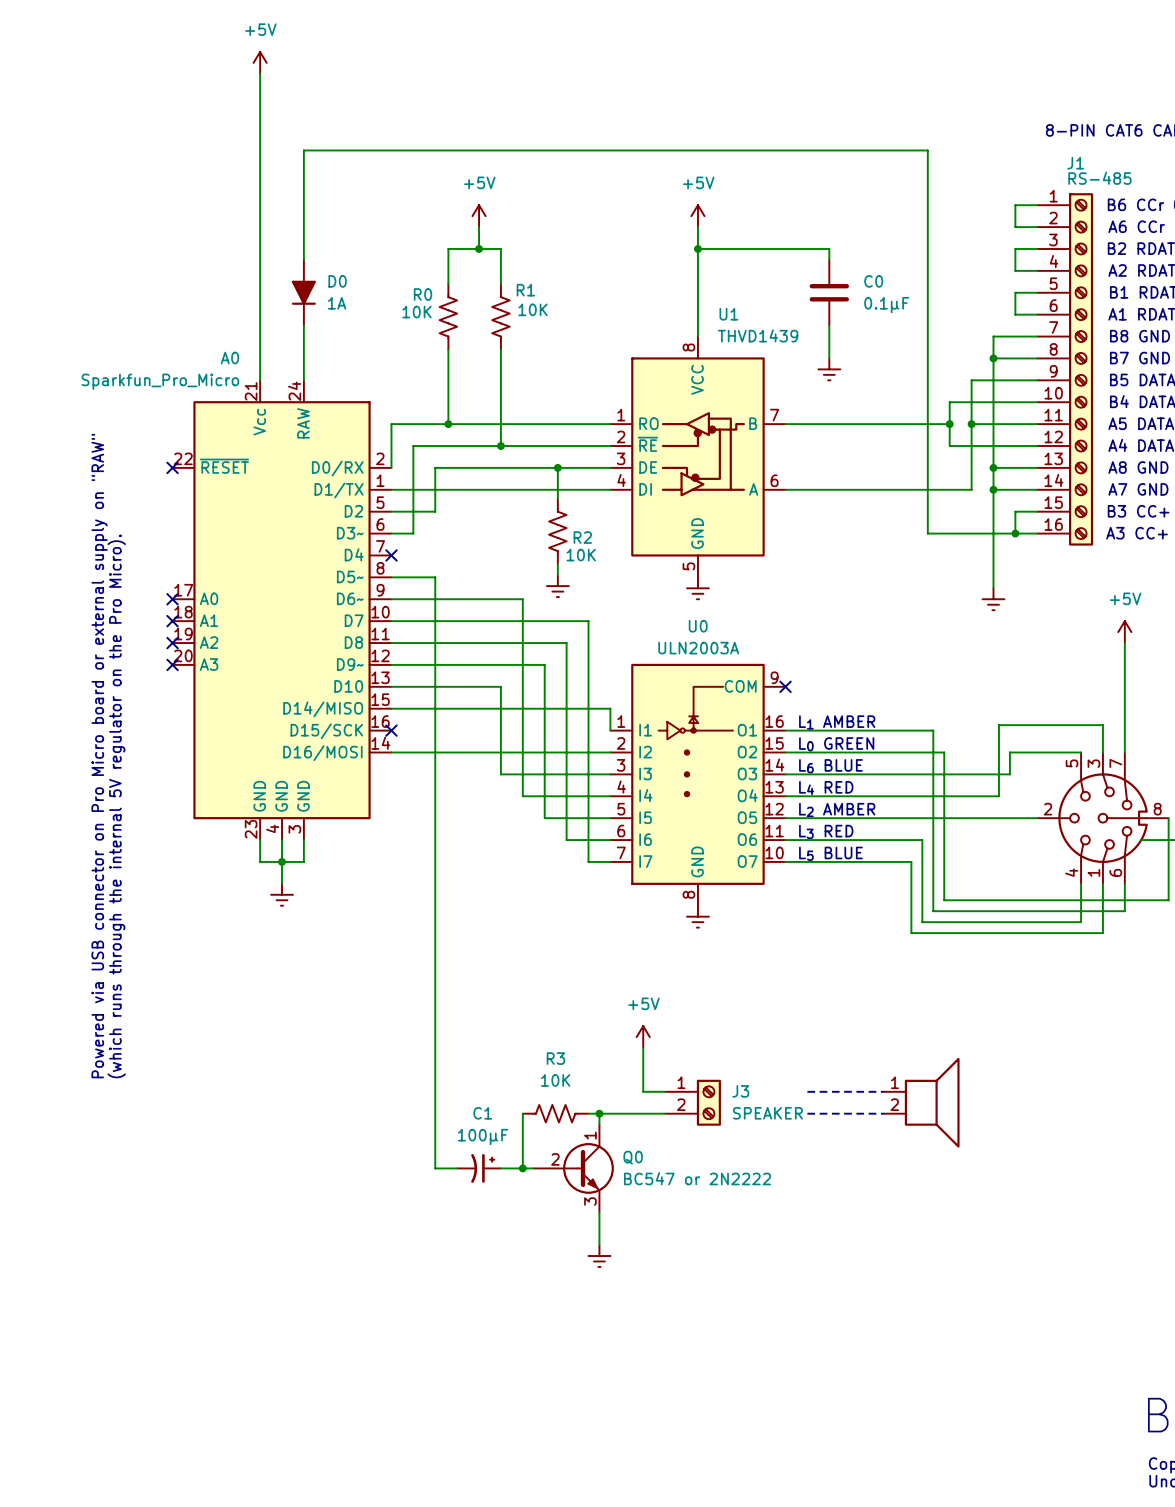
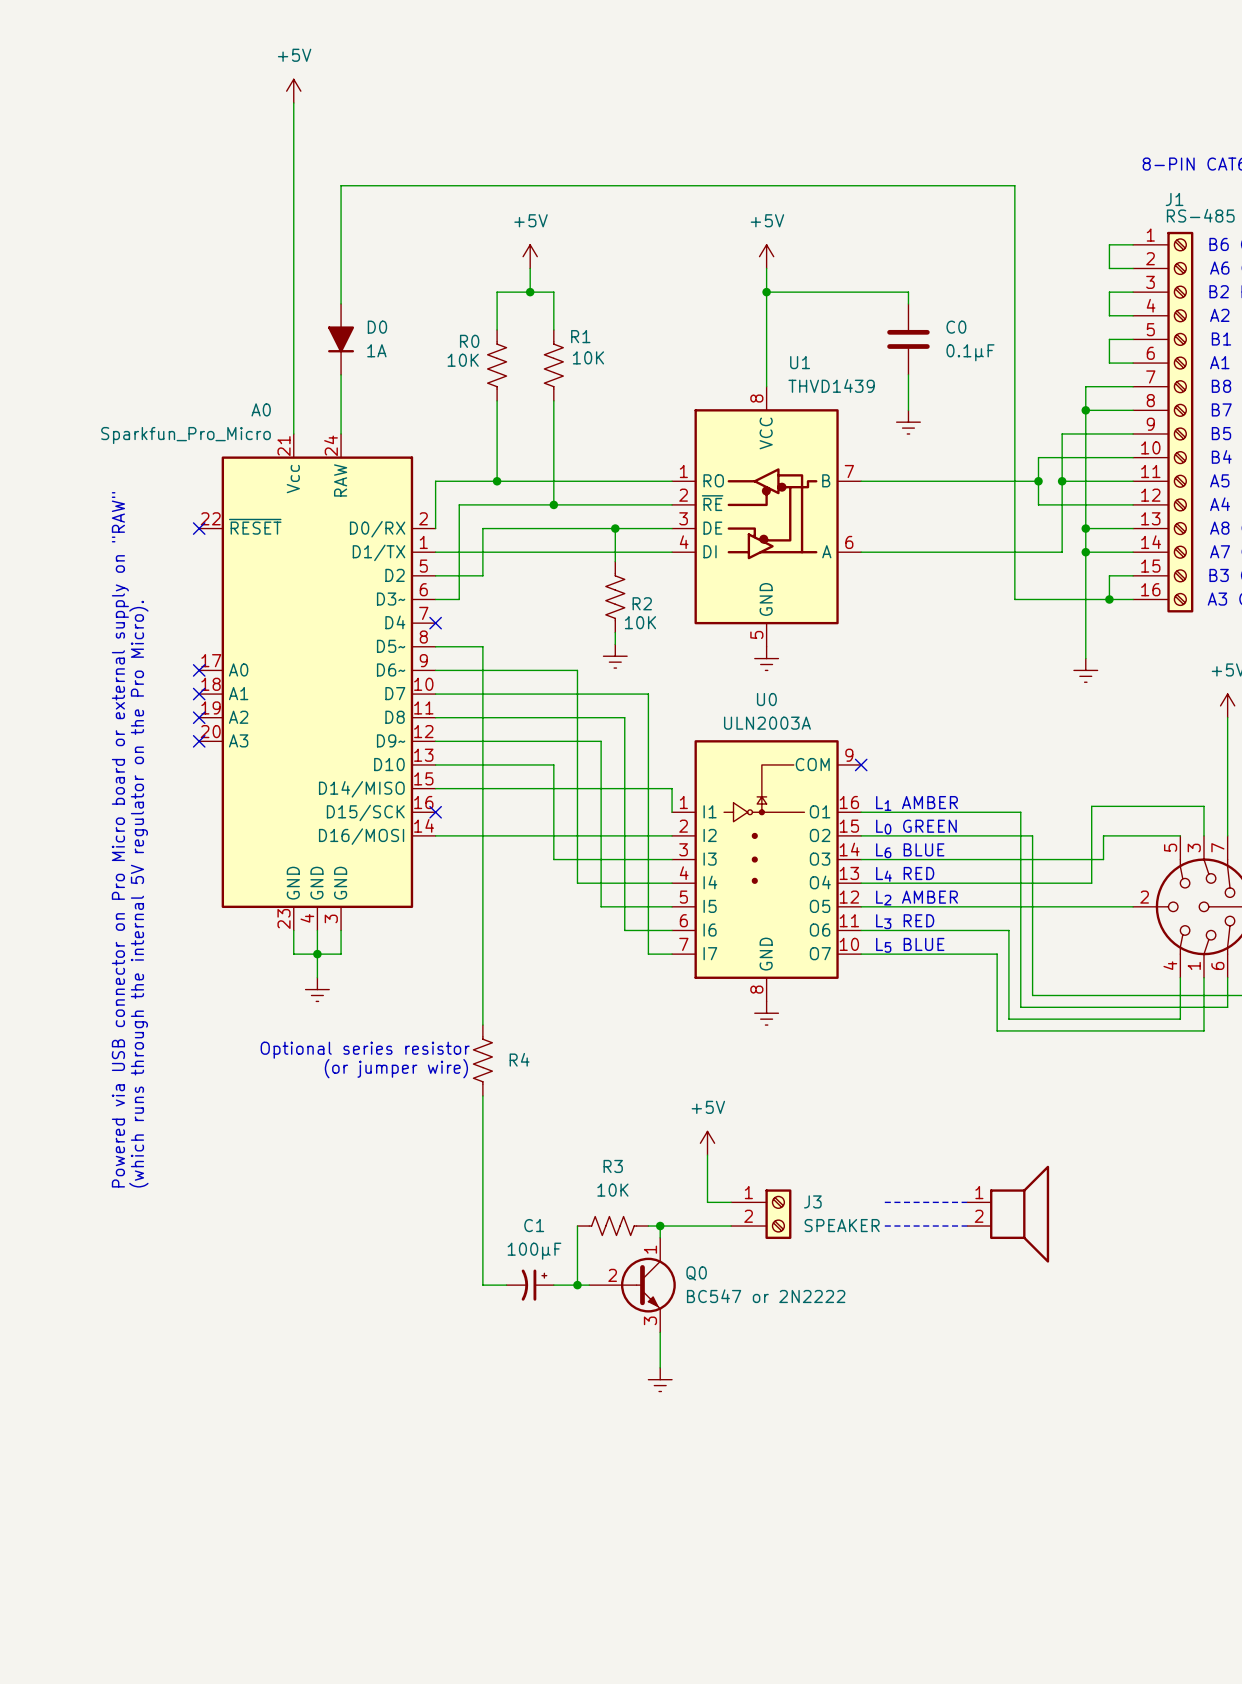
text: none -> Optional series resistor (365, 1050)
R4: none -> (482, 1060)
text: none -> (or jumper wire) (396, 1068)

